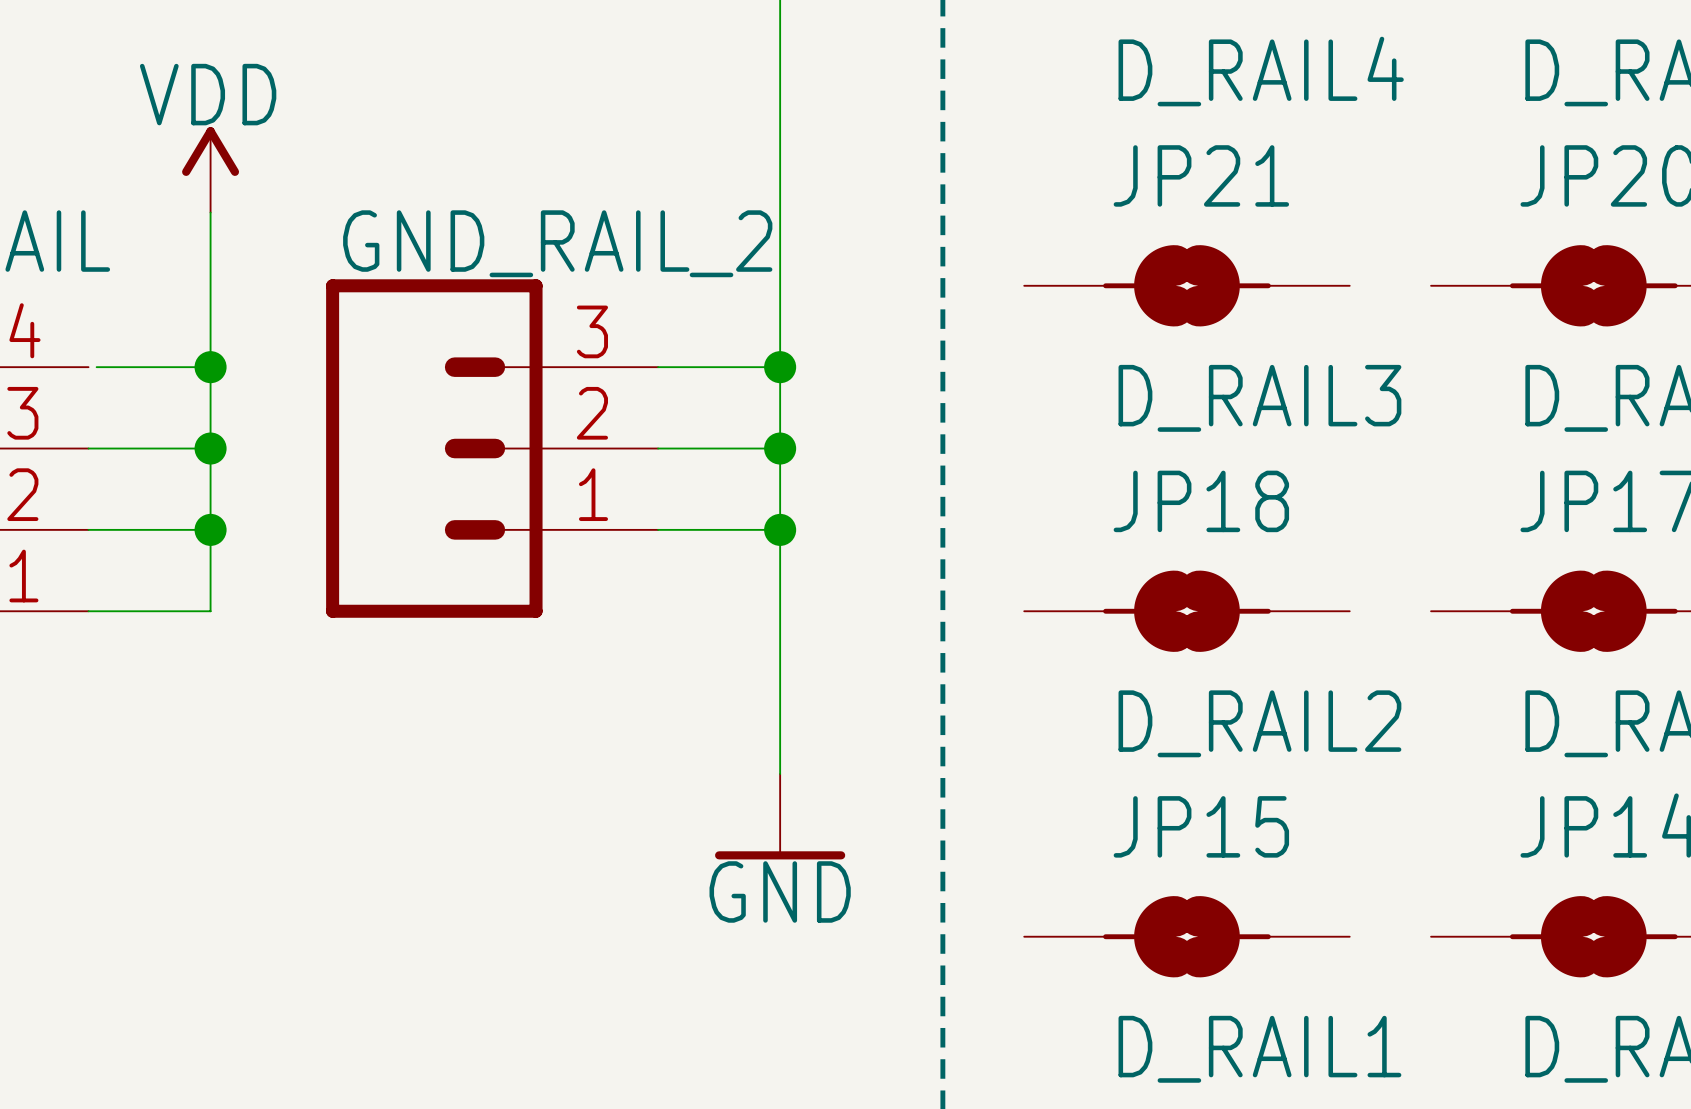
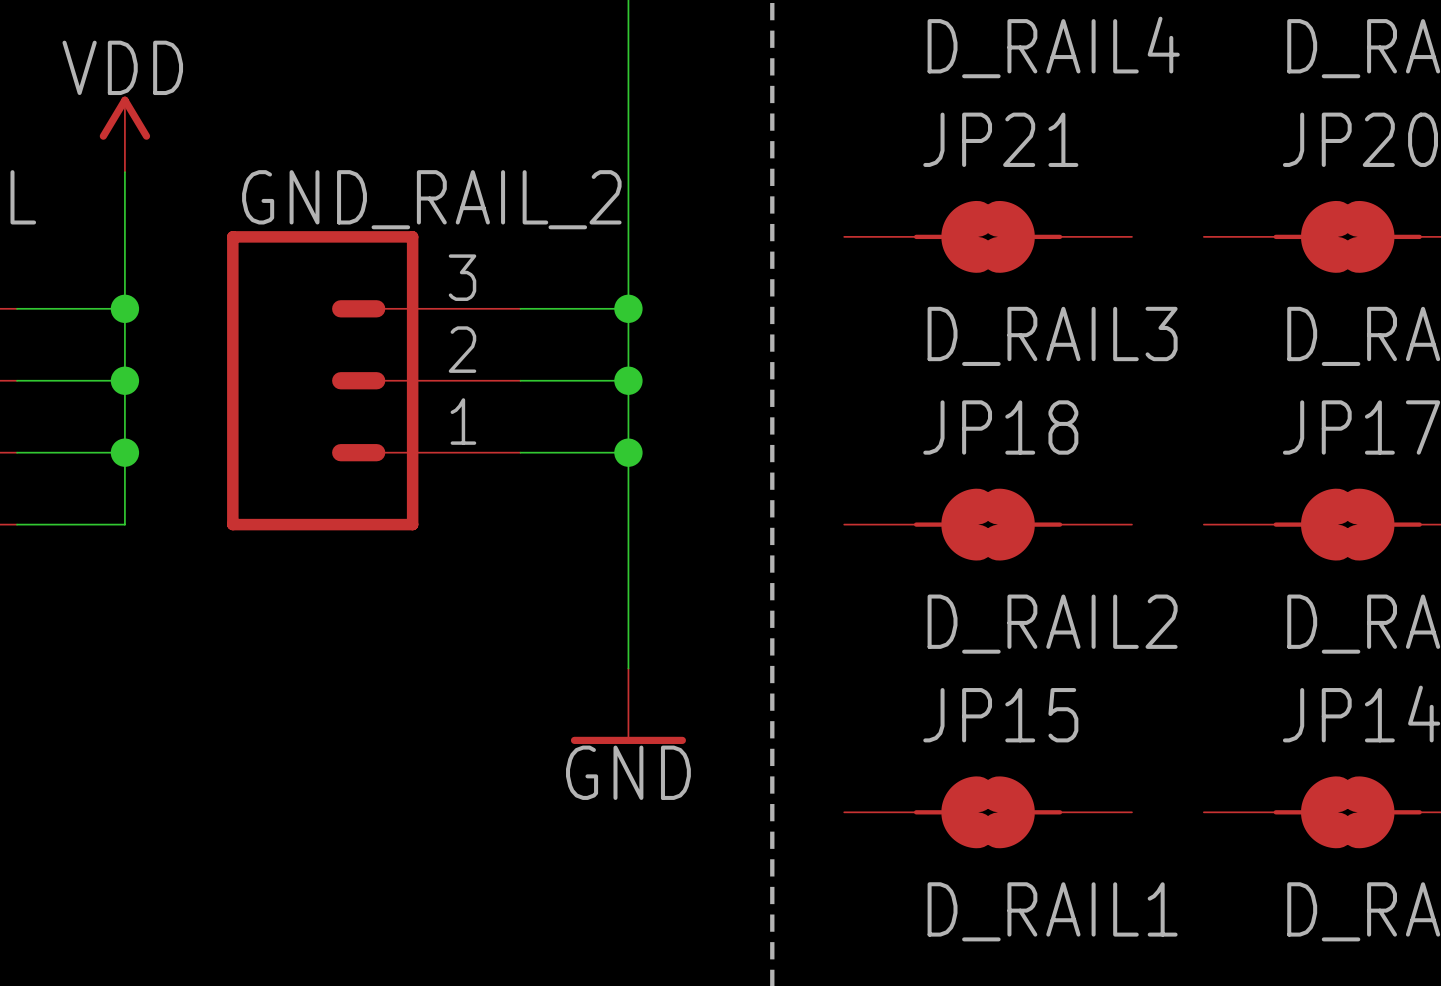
wire: none -> (17, 308) (24, 308)

